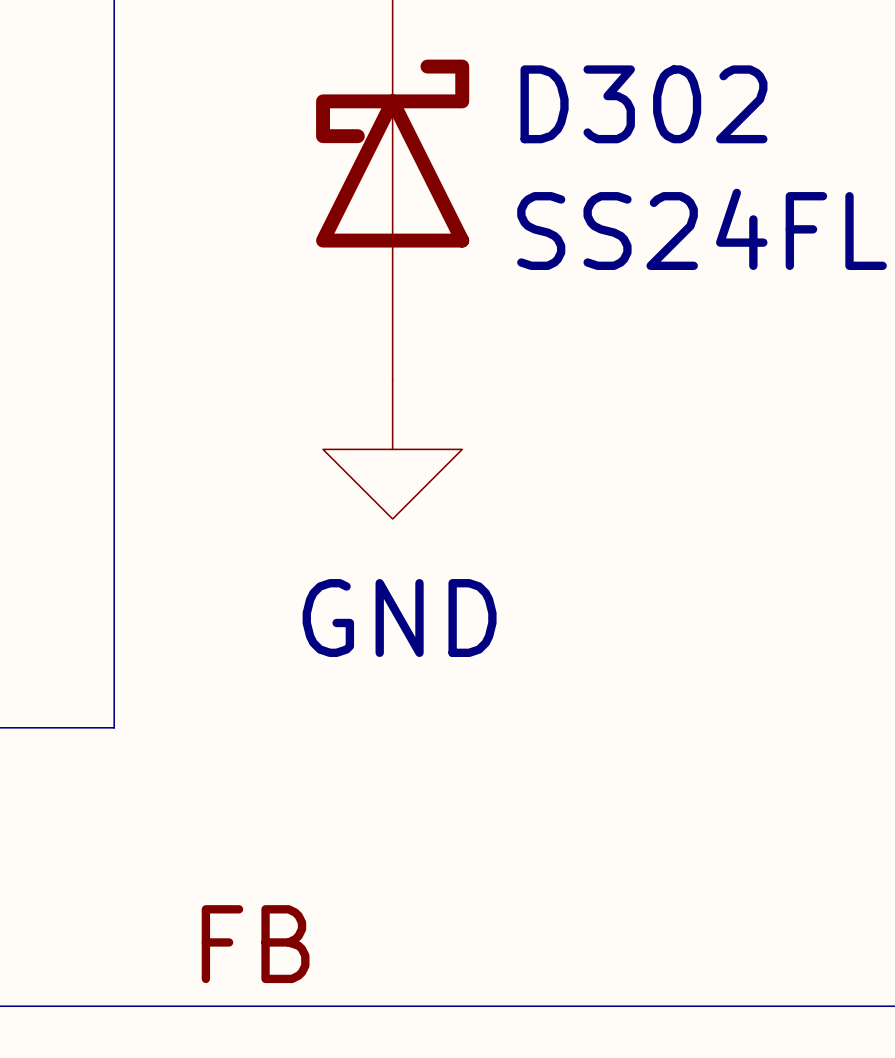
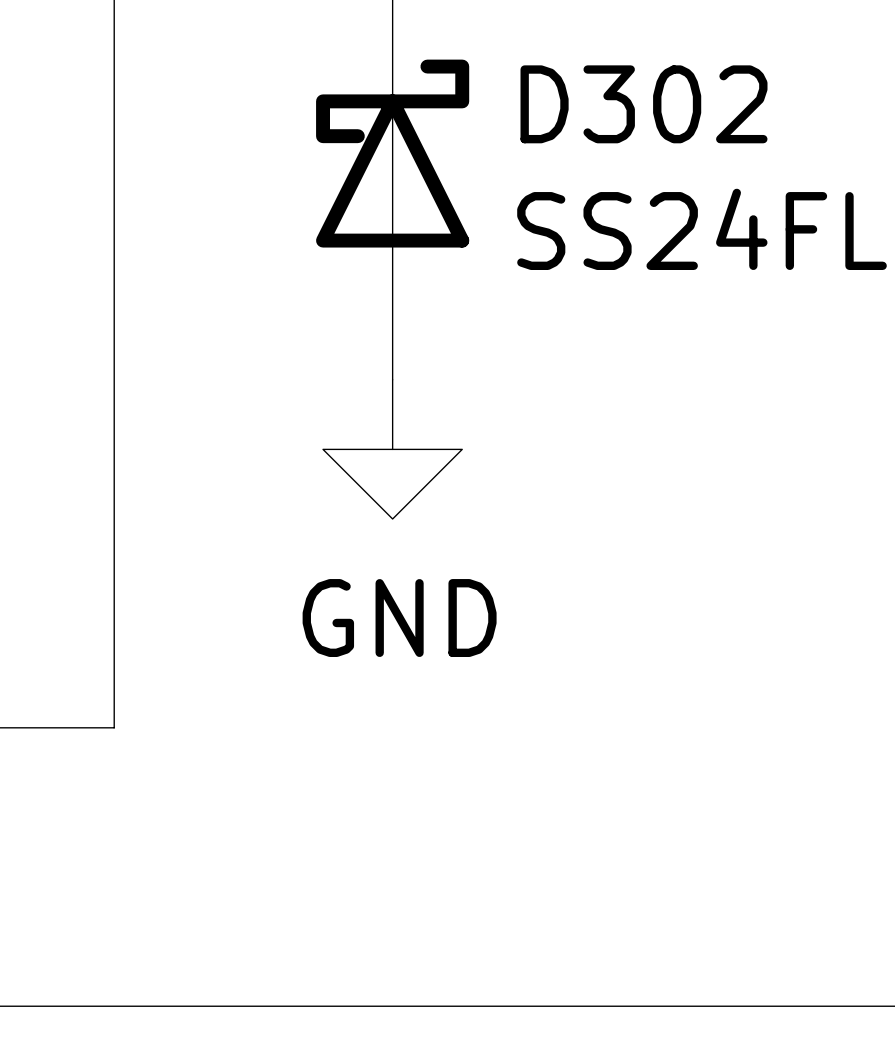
label: FB (255, 944) -> none

